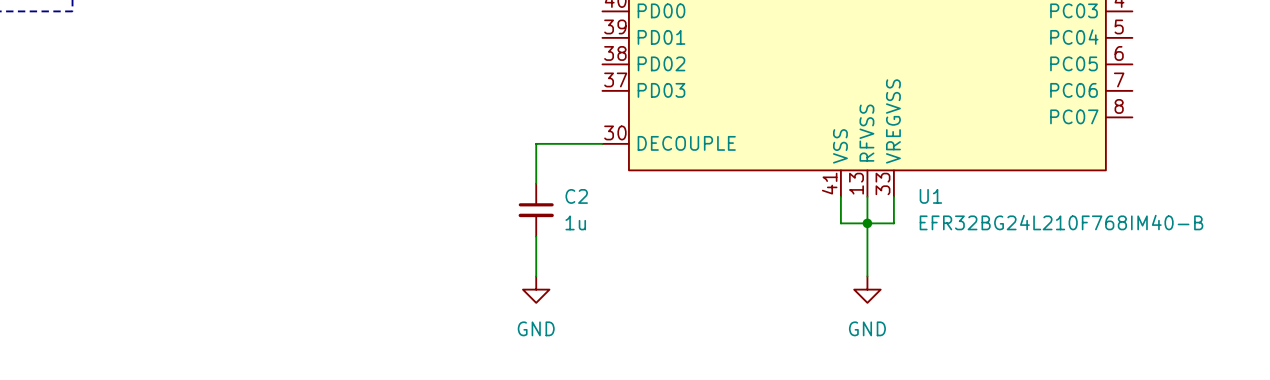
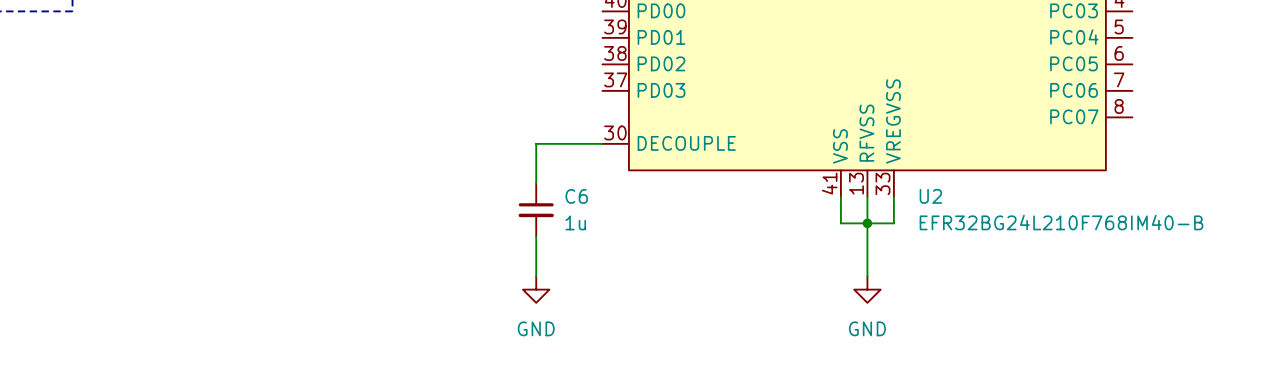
C2 name: C2 (576, 196) -> C6 (576, 196)
U1 name: U1 (930, 196) -> U2 (930, 196)

